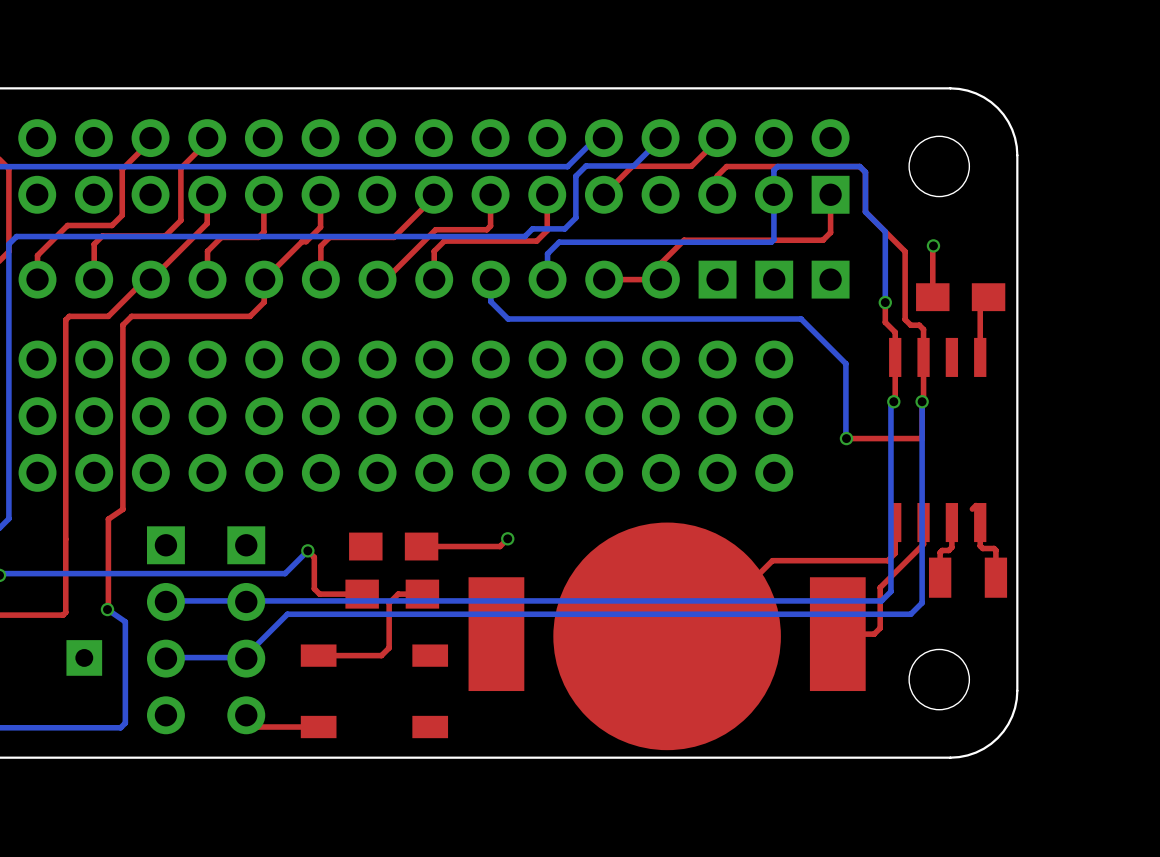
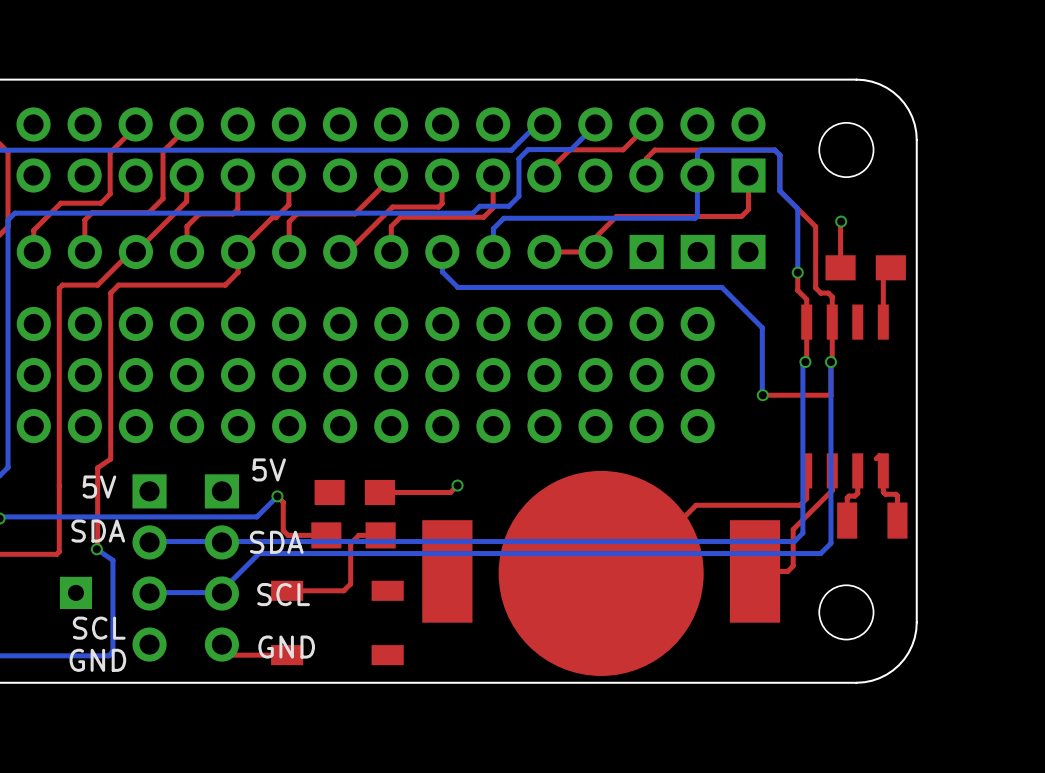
text: none -> 5V (269, 469)
text: none -> 5V (99, 487)
text: none -> SDA (98, 531)
text: none -> SDA (276, 542)
text: none -> SCL (283, 594)
text: none -> SCL (99, 628)
text: none -> GND (286, 647)
text: none -> GND (97, 660)

